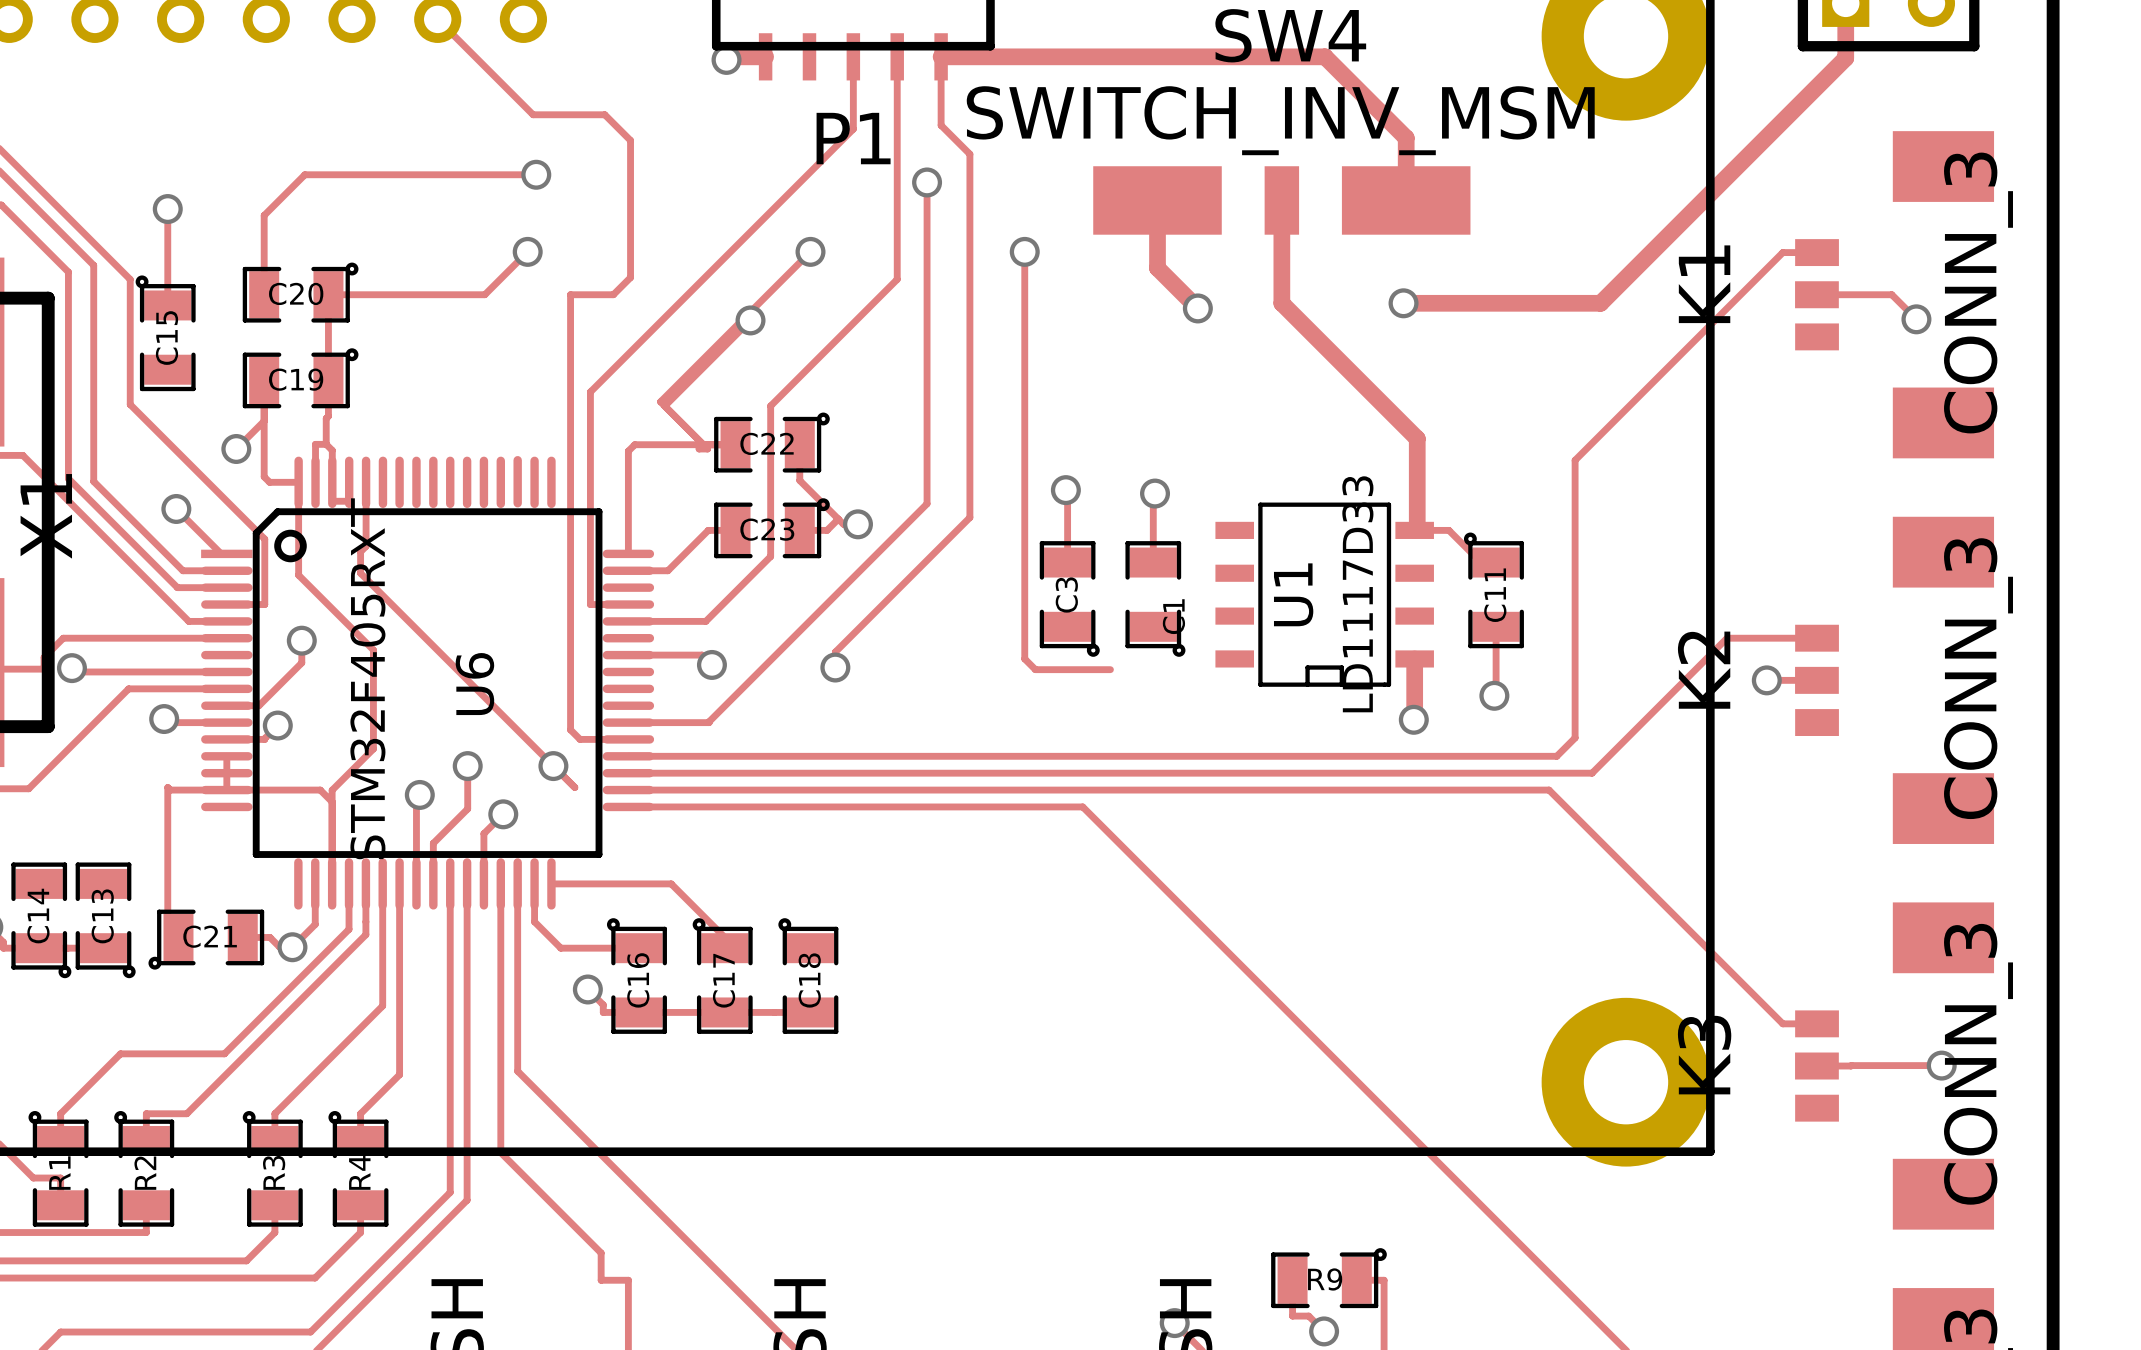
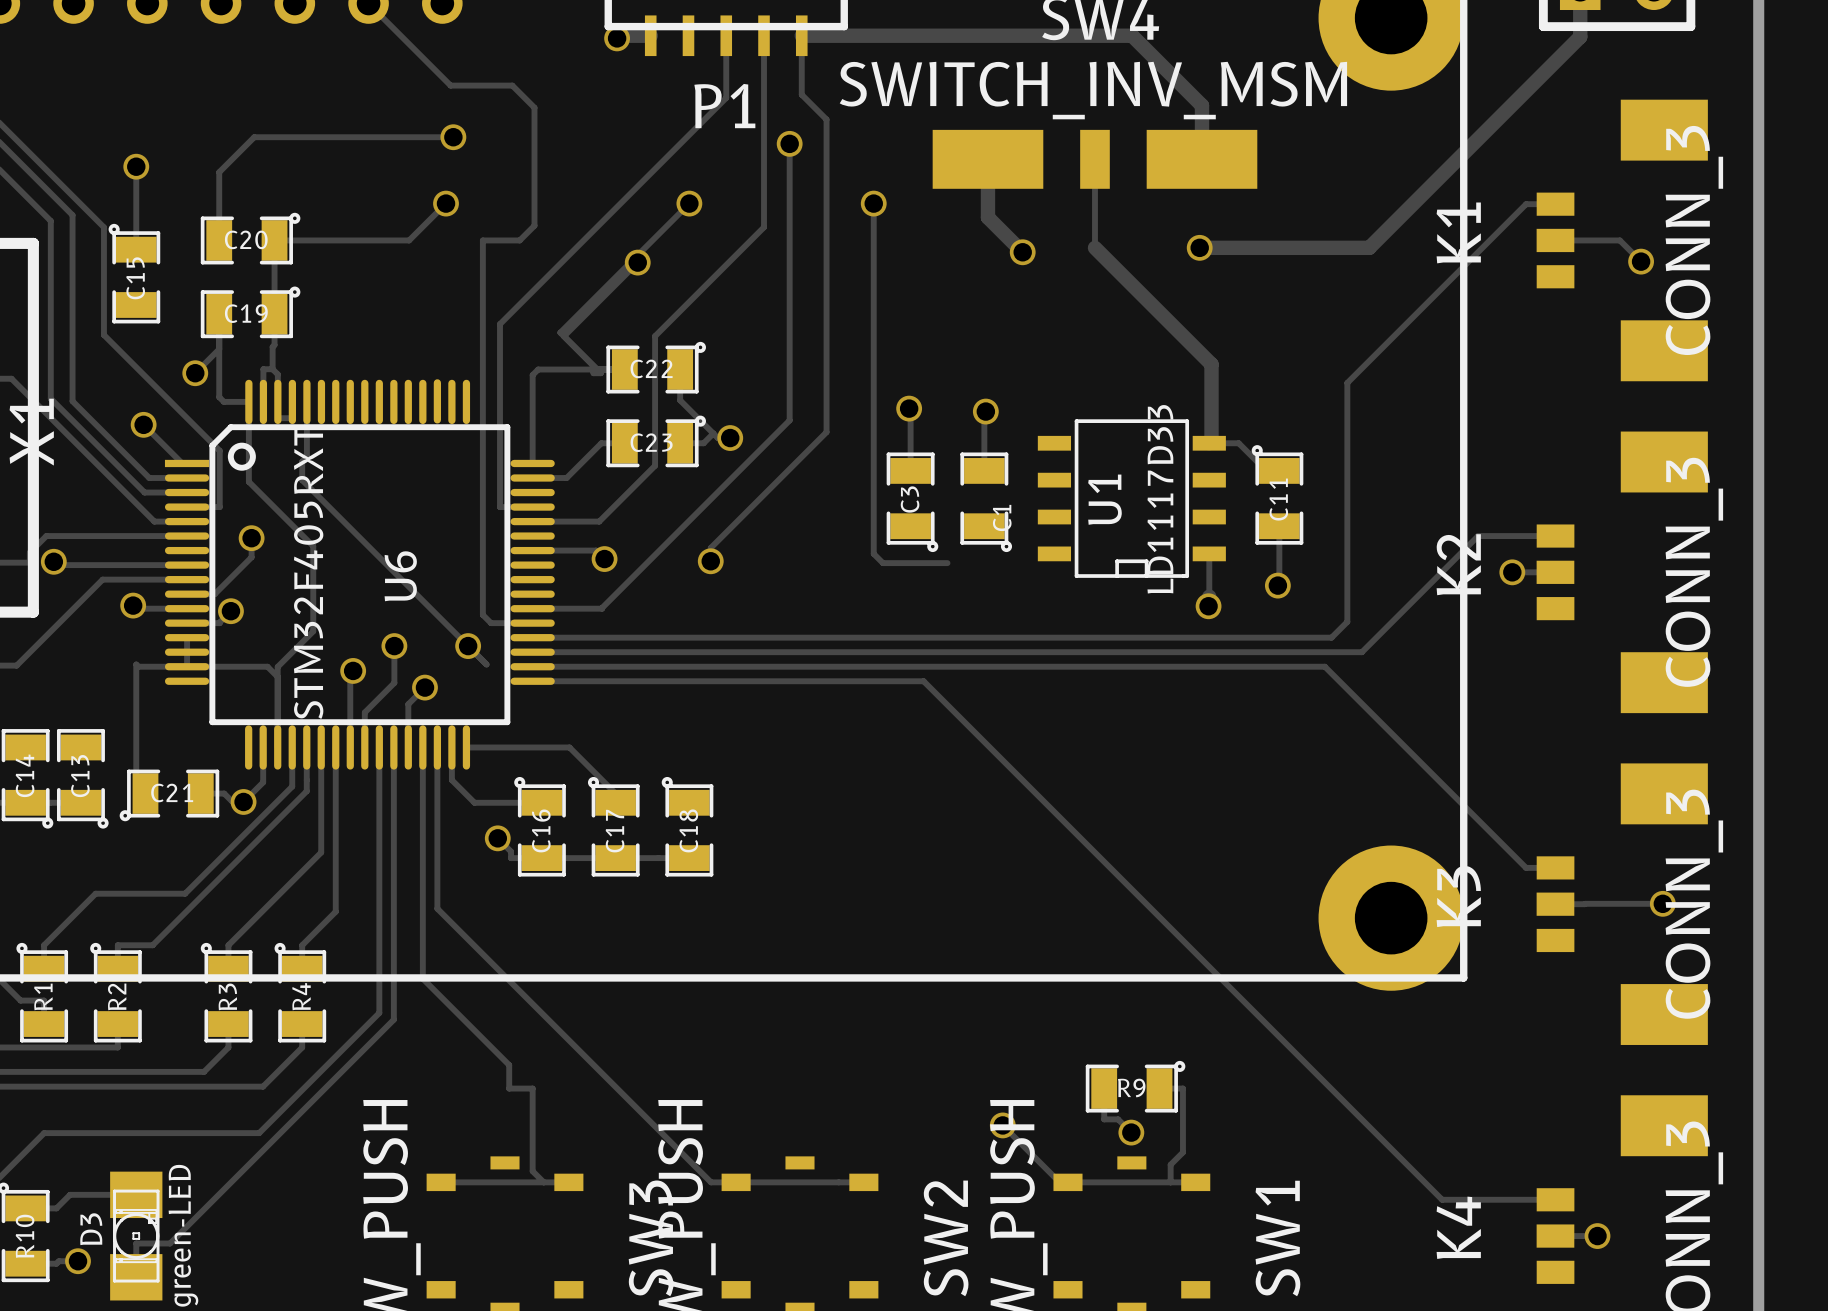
track width: thick (1281, 200) (1281, 303) -> thin (1094, 159) (1094, 247)
track width: thick (1414, 658) (1414, 708) -> thin (1209, 553) (1209, 596)

